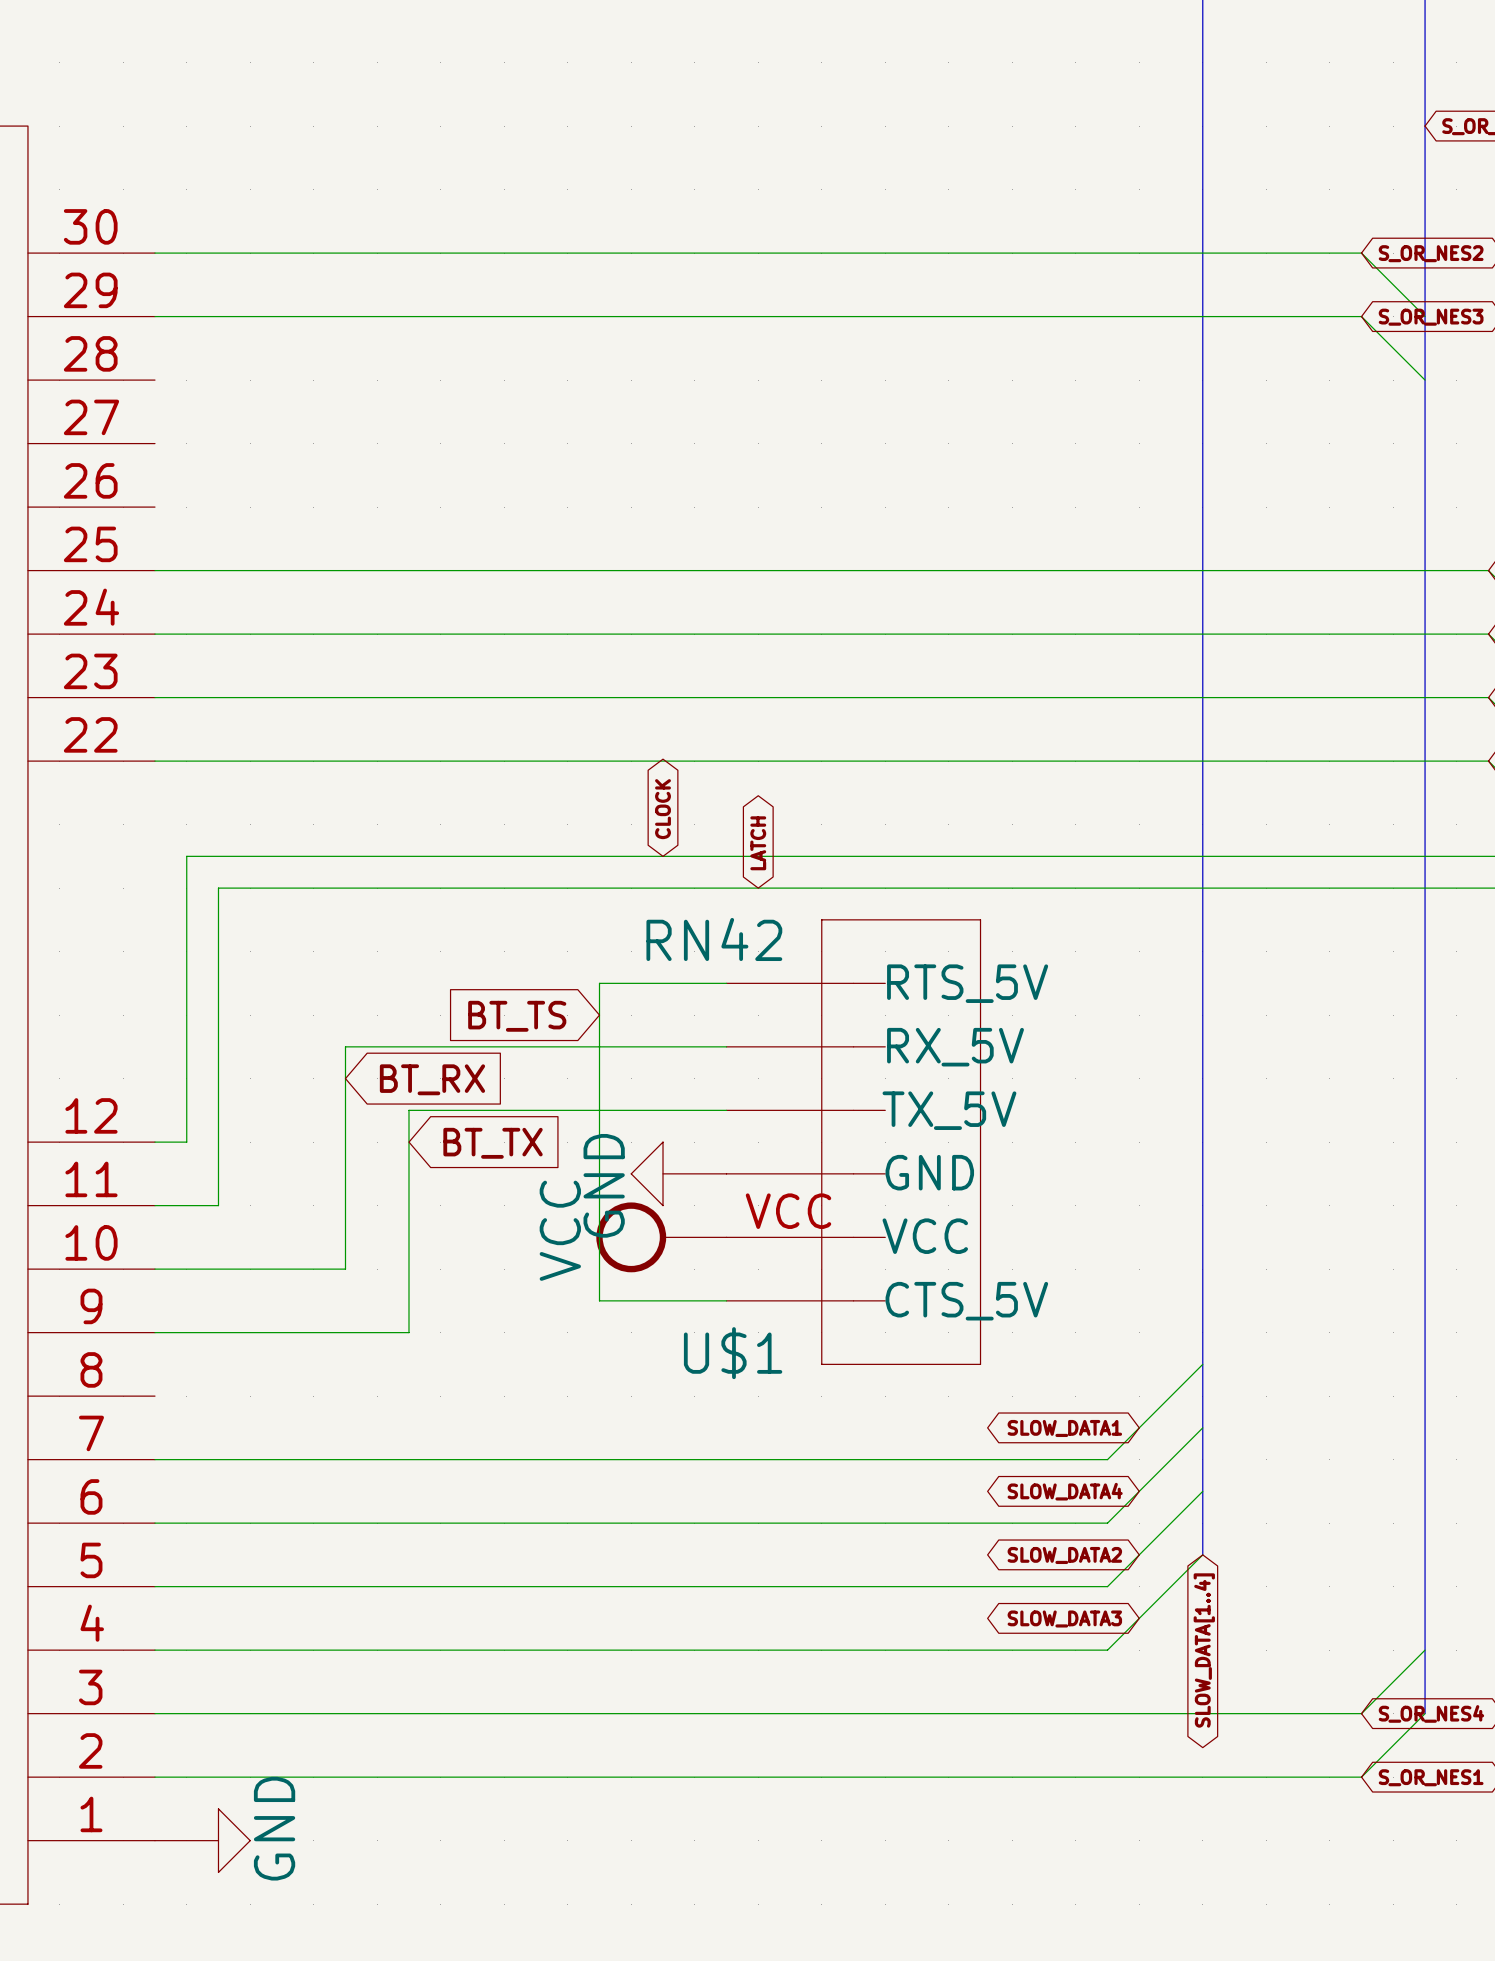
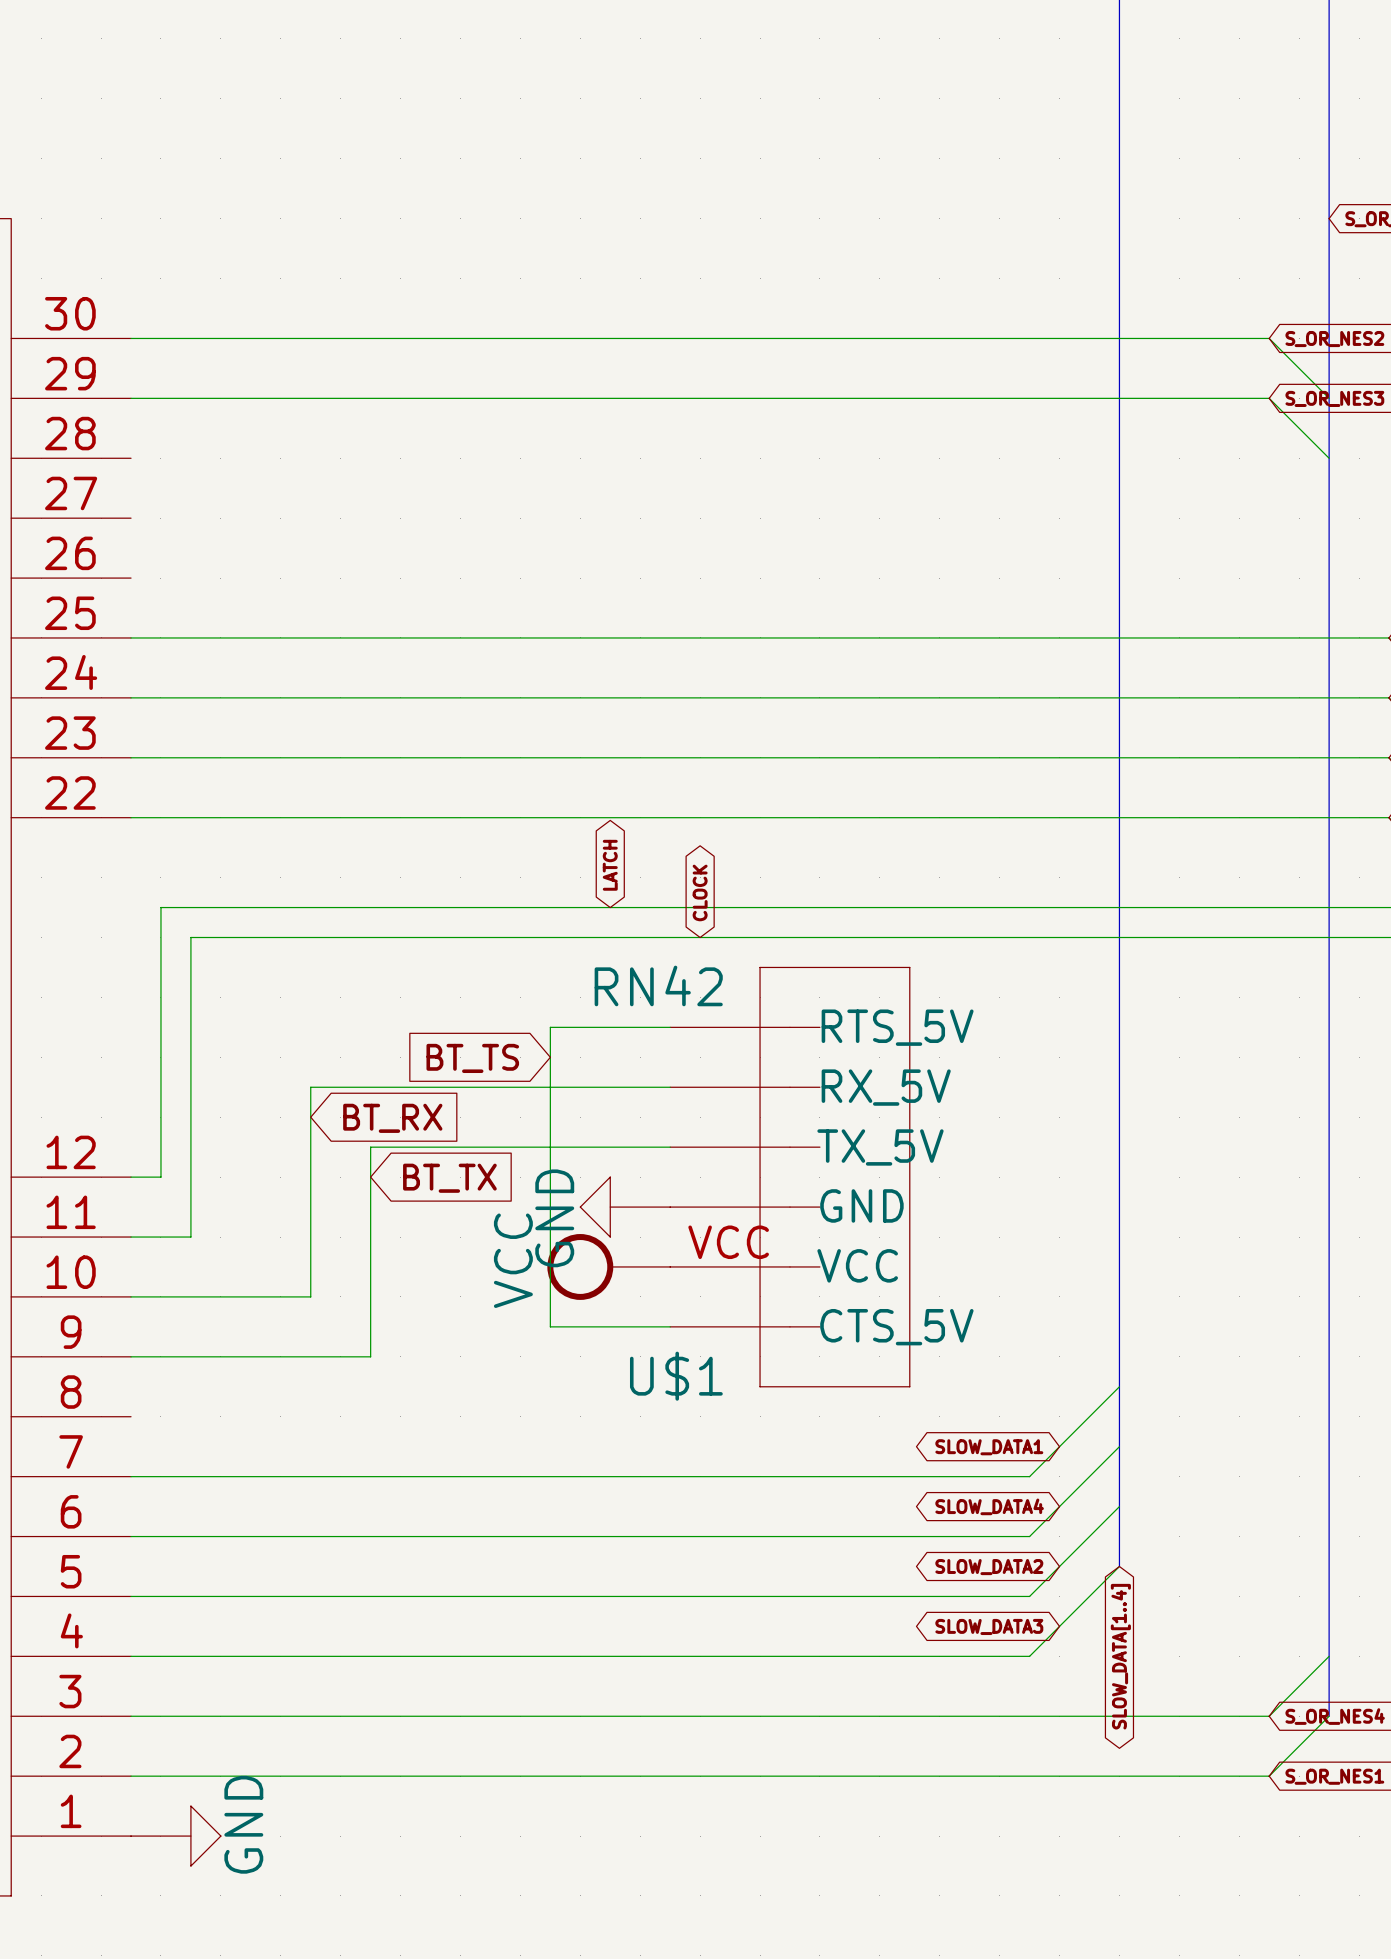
global label: CLOCK (663, 809) -> LATCH (610, 865)
global label: LATCH (758, 843) -> CLOCK (700, 892)

